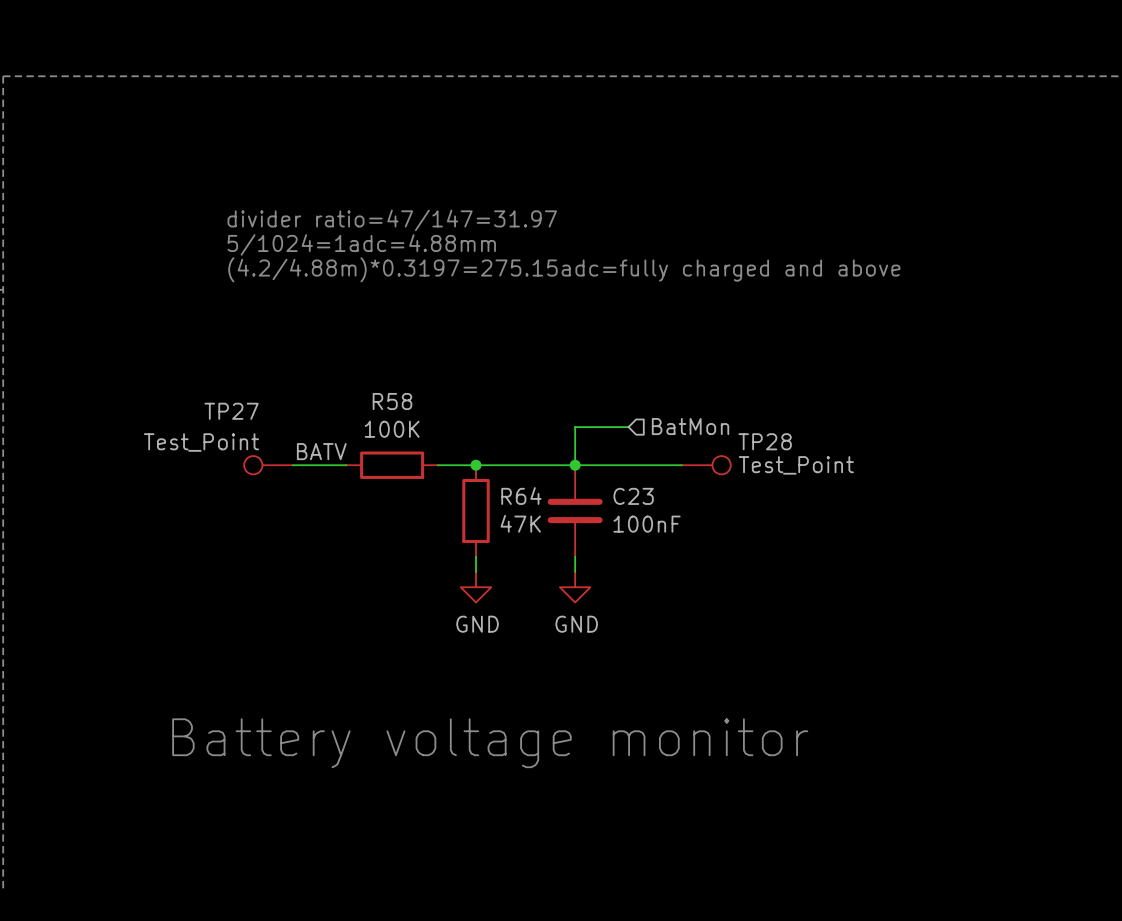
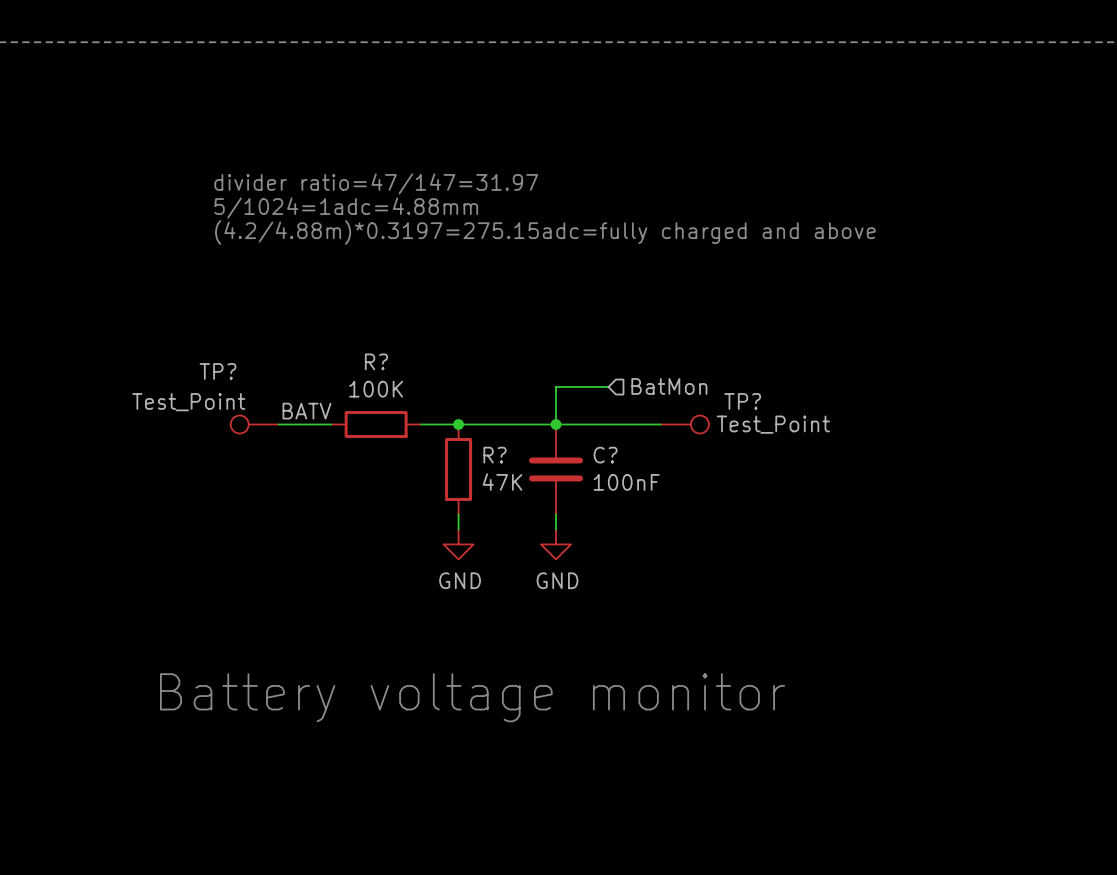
R58 name: R58 (392, 401) -> R? (376, 361)
TP27 name: TP27 (231, 411) -> TP? (218, 371)
TP28 name: TP28 (765, 441) -> TP? (742, 401)
R64 name: R64 (521, 496) -> R? (495, 455)
C23 name: C23 (633, 496) -> C? (605, 455)

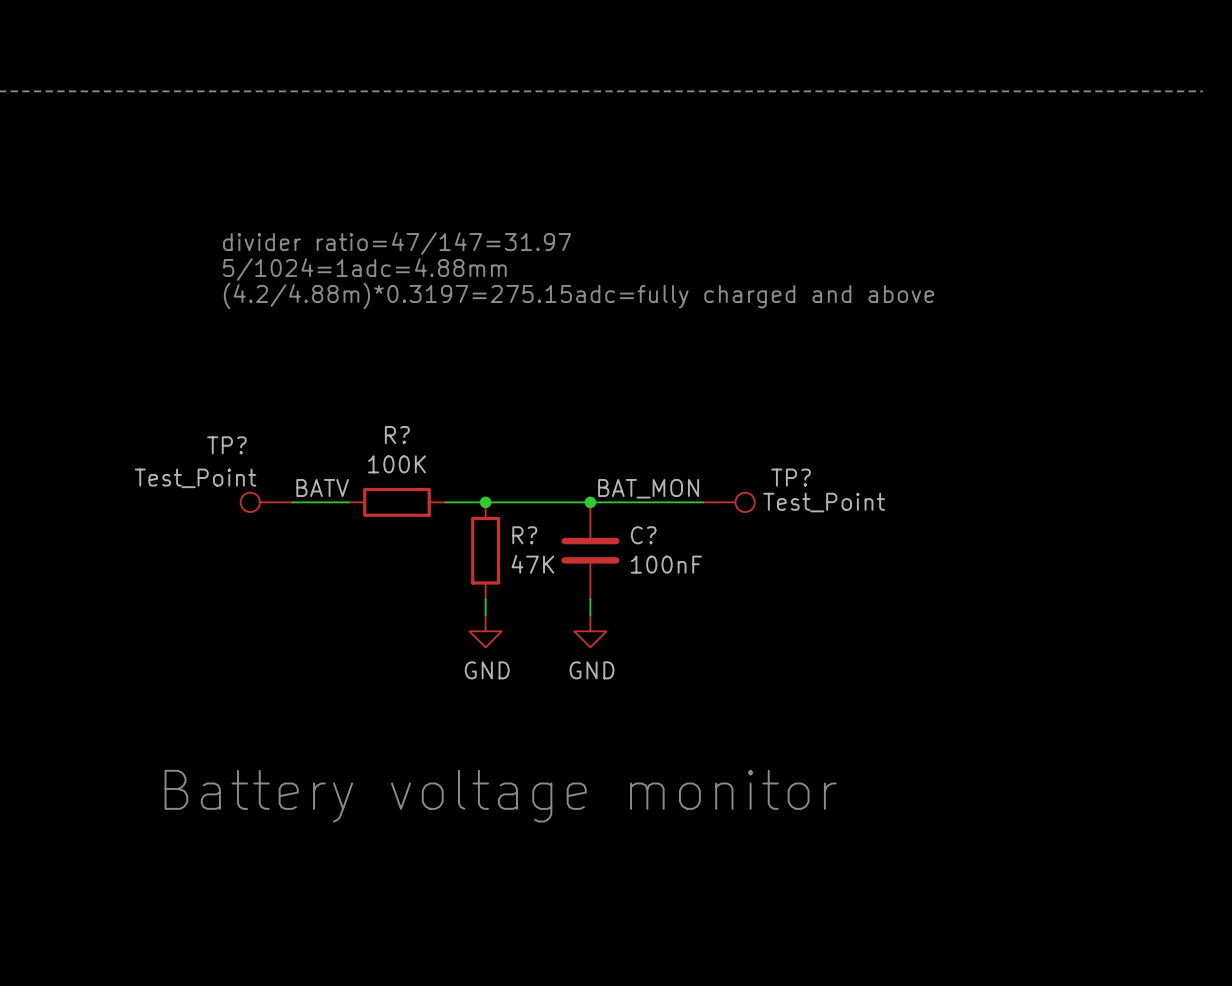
hierarchical label: BatMon (669, 386) -> none
wire: (608, 387) (556, 387) (556, 424) -> none
label: none -> BAT_MON (648, 488)

